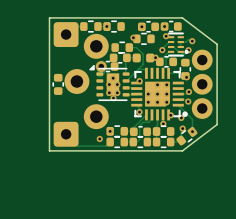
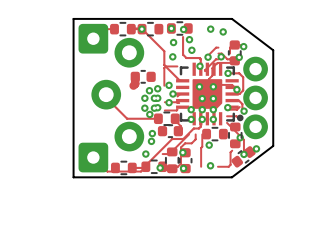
track: none -> (129, 28) (141, 28) (164, 51) (164, 65) (180, 80) (182, 80)
via: none -> (171, 28)
part: none -> (179, 28)
part: (148, 26) -> none
part: (171, 26) -> none
via: none -> (223, 31)
part footprint: [167, 32, 189, 57] -> [227, 40, 242, 66]
track: none -> (183, 37) (183, 54) (186, 58) (199, 58) (200, 69)
via: none -> (189, 39)
via: (166, 36) -> none
part: (143, 38) -> none
via: none -> (191, 50)
part: (122, 47) -> none
track: (129, 47) (136, 47) (143, 54) (143, 64) (126, 80) -> none
via: none -> (172, 56)
via: none -> (221, 56)
part: (120, 57) -> none
part: (143, 57) -> none
part: (166, 61) -> none
track: none -> (228, 73) (239, 73) (243, 77) (243, 90) (239, 94) (232, 94)
via: none -> (228, 73)
via: (101, 66) -> none
track: (138, 69) (143, 69) (146, 73) -> none
part: (185, 69) -> none
via: none -> (169, 85)
via: none -> (199, 86)
via: none -> (213, 86)
via: none -> (157, 88)
via: none -> (173, 94)
via: (139, 81) -> none
part: (109, 82) -> none
part: (58, 84) -> none
track: none -> (106, 98) (127, 118) (158, 118)
via: none -> (157, 98)
track: none -> (232, 100) (238, 100) (242, 104) (244, 111)
via: none -> (169, 102)
via: (188, 91) -> none
via: none -> (157, 107)
via: none -> (227, 107)
part position: (159, 94) -> (209, 94)
via: none -> (244, 111)
part: none -> (166, 118)
track: none -> (200, 118) (199, 128) (193, 128) (183, 139) (172, 139) (143, 167) (129, 167)
via: (188, 101) -> none
part: none -> (170, 131)
via: (139, 112) -> none
via: none -> (152, 133)
part: none -> (214, 134)
via: (170, 115) -> none
part: none -> (235, 135)
via: (181, 117) -> none
via: none -> (240, 137)
via: none -> (151, 141)
part footprint: [176, 126, 198, 146] -> [231, 146, 256, 168]
via: none -> (256, 148)
via: (182, 128) -> none
via: none -> (182, 152)
part: (117, 131) -> none
part rotation: 0° (140, 131) -> 90° clockwise (185, 160)
part: (163, 131) -> none
part: none -> (172, 160)
via: (99, 138) -> none
via: none -> (210, 165)
part: (140, 142) -> none
part: (163, 142) -> none
part: none -> (123, 167)
via: none -> (160, 167)
via: none -> (183, 168)

